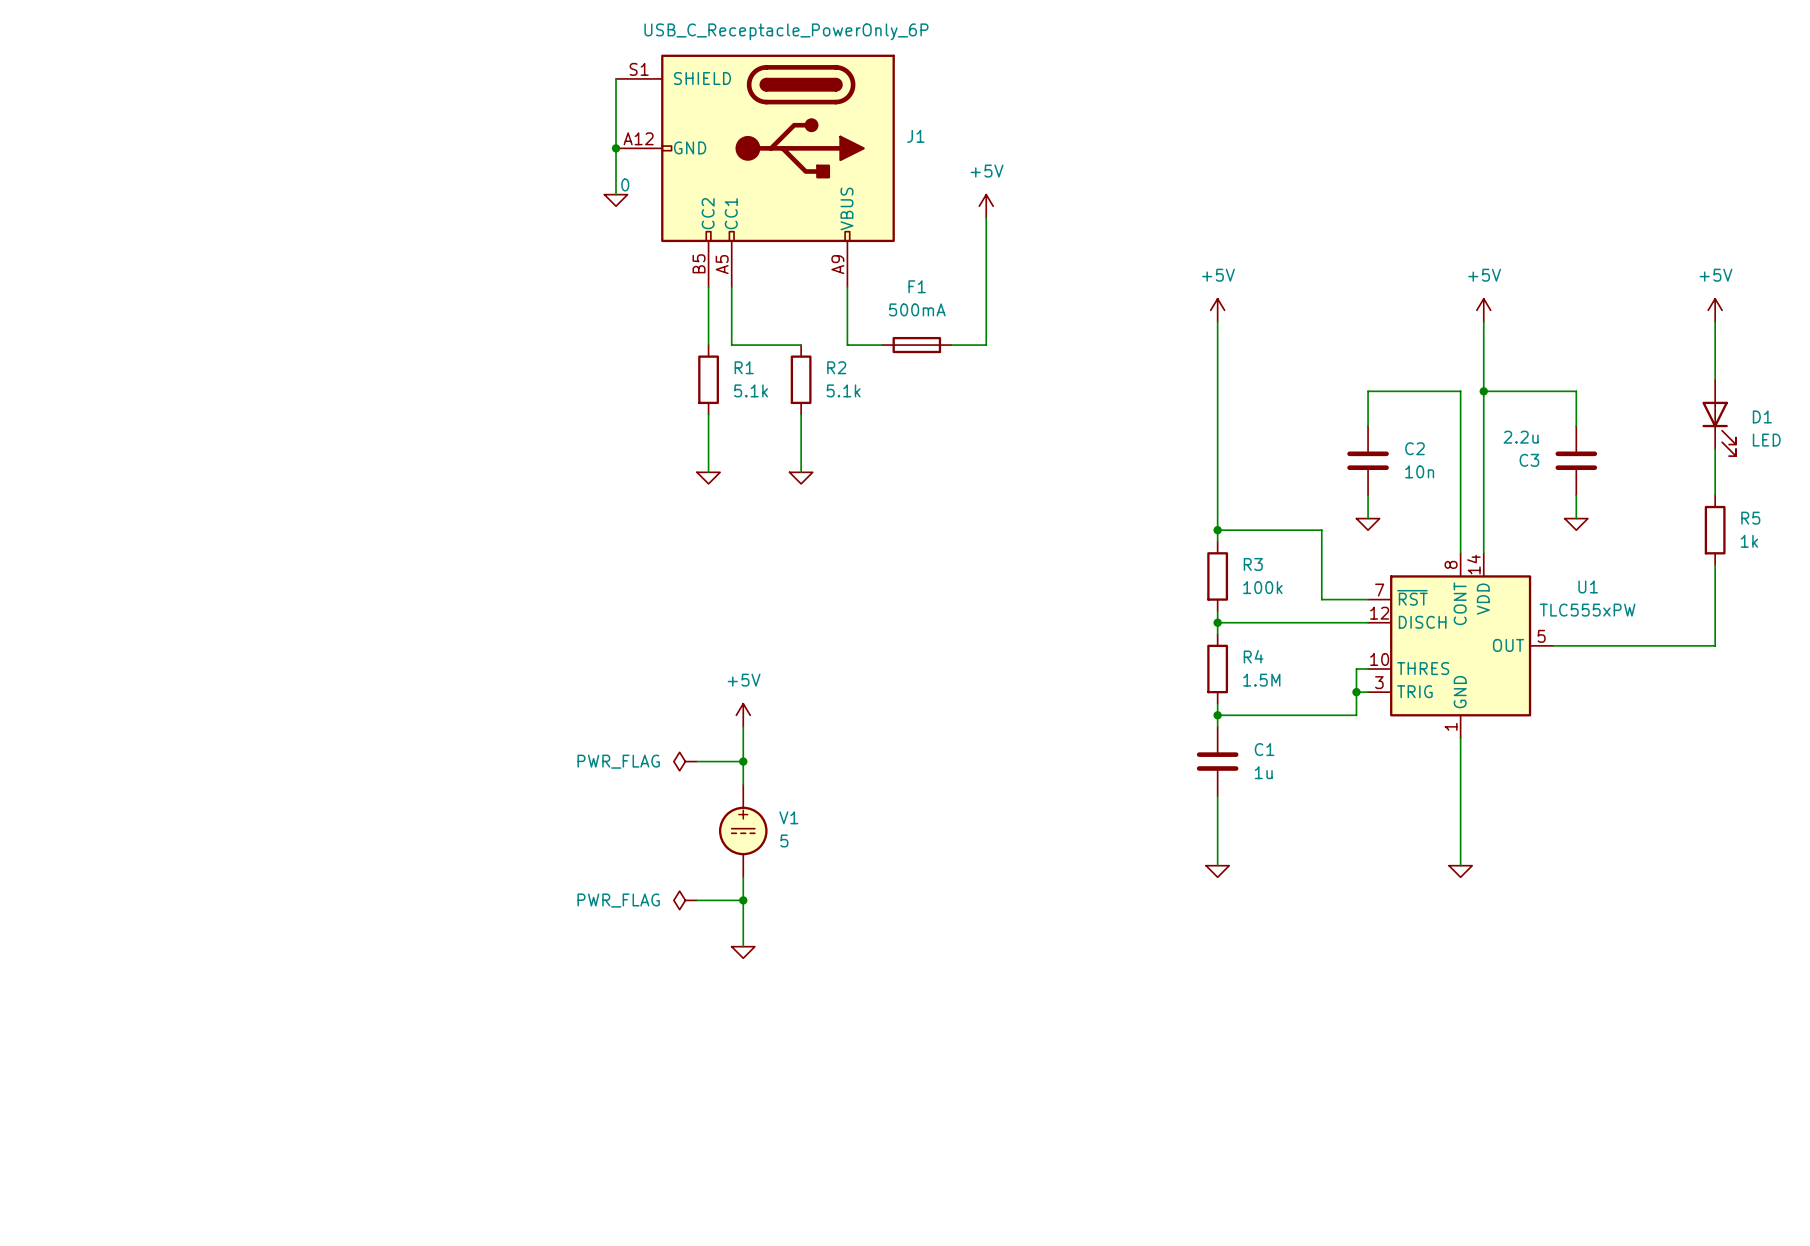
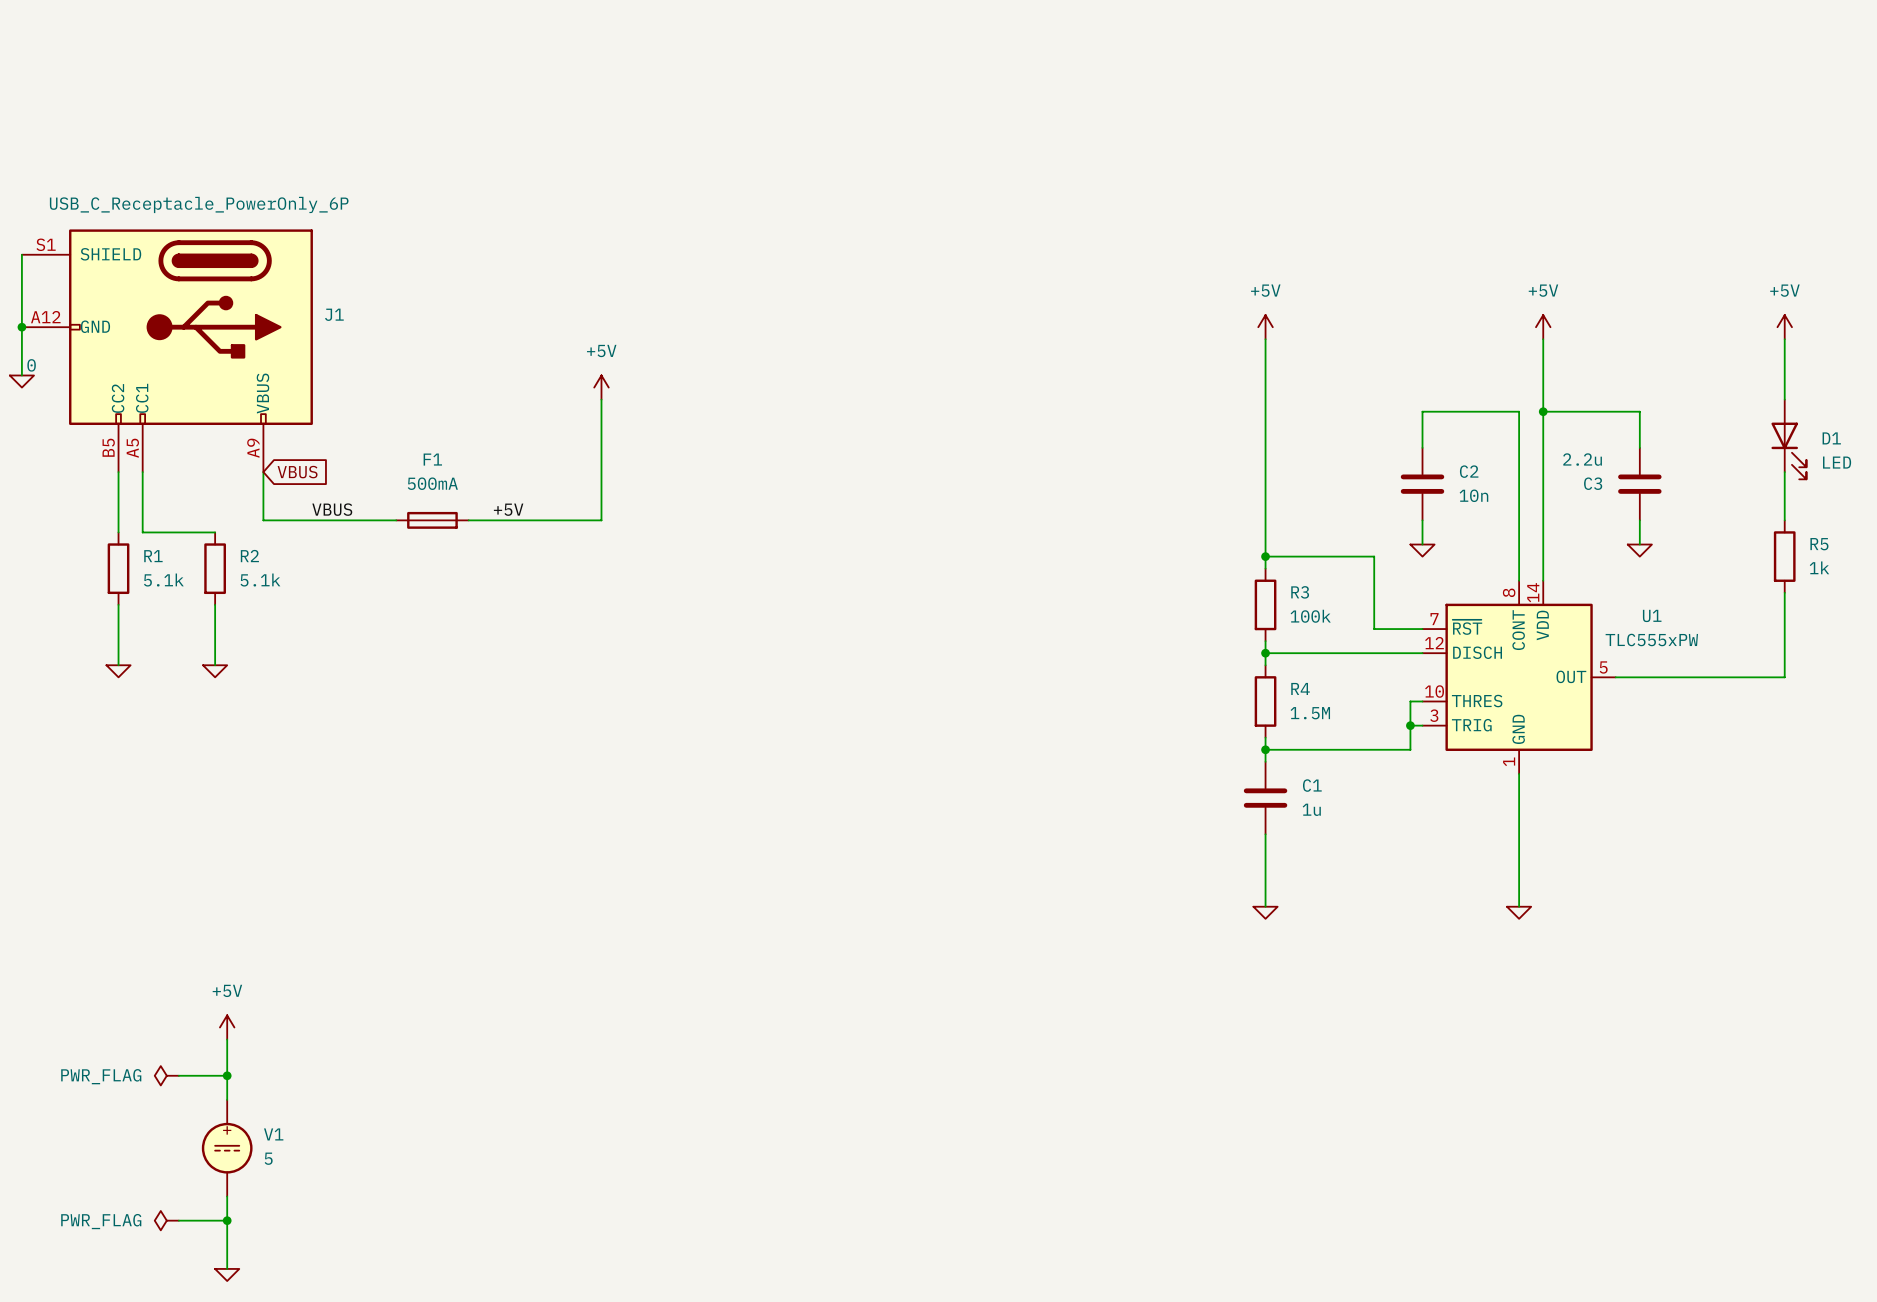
wire: (616, 78) (616, 194) -> none
junction: (616, 148) -> none
J1 position: (755, 170) -> (167, 350)
power symbol: 0 (616, 200) -> none
power symbol: +5V (986, 206) -> none
wire: (986, 217) (986, 345) (951, 345) -> none
wire: none -> (21, 254) (21, 375)
wire: (708, 287) (708, 345) -> none
wire: (731, 287) (731, 345) (801, 345) -> none
wire: (847, 287) (847, 345) (882, 345) -> none
junction: none -> (21, 327)
F1 position: (916, 345) -> (432, 520)
power symbol: none -> 0 (21, 381)
power symbol: none -> +5V (601, 387)
wire: none -> (601, 399) (601, 520) (468, 520)
R1 position: (708, 379) -> (118, 568)
R2 position: (801, 379) -> (215, 568)
wire: (708, 414) (708, 472) -> none
wire: (801, 414) (801, 472) -> none
wire: none -> (118, 472) (118, 532)
wire: none -> (142, 472) (142, 532) (215, 532)
wire: none -> (263, 472) (263, 520) (396, 520)
global label: none -> VBUS (297, 472)
power symbol: (708, 478) -> none
power symbol: (801, 478) -> none
label: none -> VBUS (332, 509)
label: none -> +5V (508, 509)
wire: none -> (118, 604) (118, 665)
wire: none -> (215, 604) (215, 665)
power symbol: none -> (118, 671)
power symbol: none -> (215, 671)
power symbol: +5V (743, 715) -> none
wire: (743, 726) (743, 784) -> none
power symbol: PWR_FLAG (685, 761) -> none
wire: (697, 761) (743, 761) -> none
junction: (743, 761) -> none
V1 position: (743, 830) -> (227, 1148)
wire: (743, 877) (743, 946) -> none
power symbol: PWR_FLAG (685, 900) -> none
wire: (697, 900) (743, 900) -> none
junction: (743, 900) -> none
power symbol: (743, 952) -> none
power symbol: none -> +5V (227, 1027)
wire: none -> (227, 1039) (227, 1099)
power symbol: none -> PWR_FLAG (166, 1075)
wire: none -> (178, 1075) (227, 1075)
junction: none -> (227, 1075)
wire: none -> (227, 1196) (227, 1268)
power symbol: none -> PWR_FLAG (166, 1220)
wire: none -> (178, 1220) (227, 1220)
junction: none -> (227, 1220)
power symbol: none -> (227, 1274)

